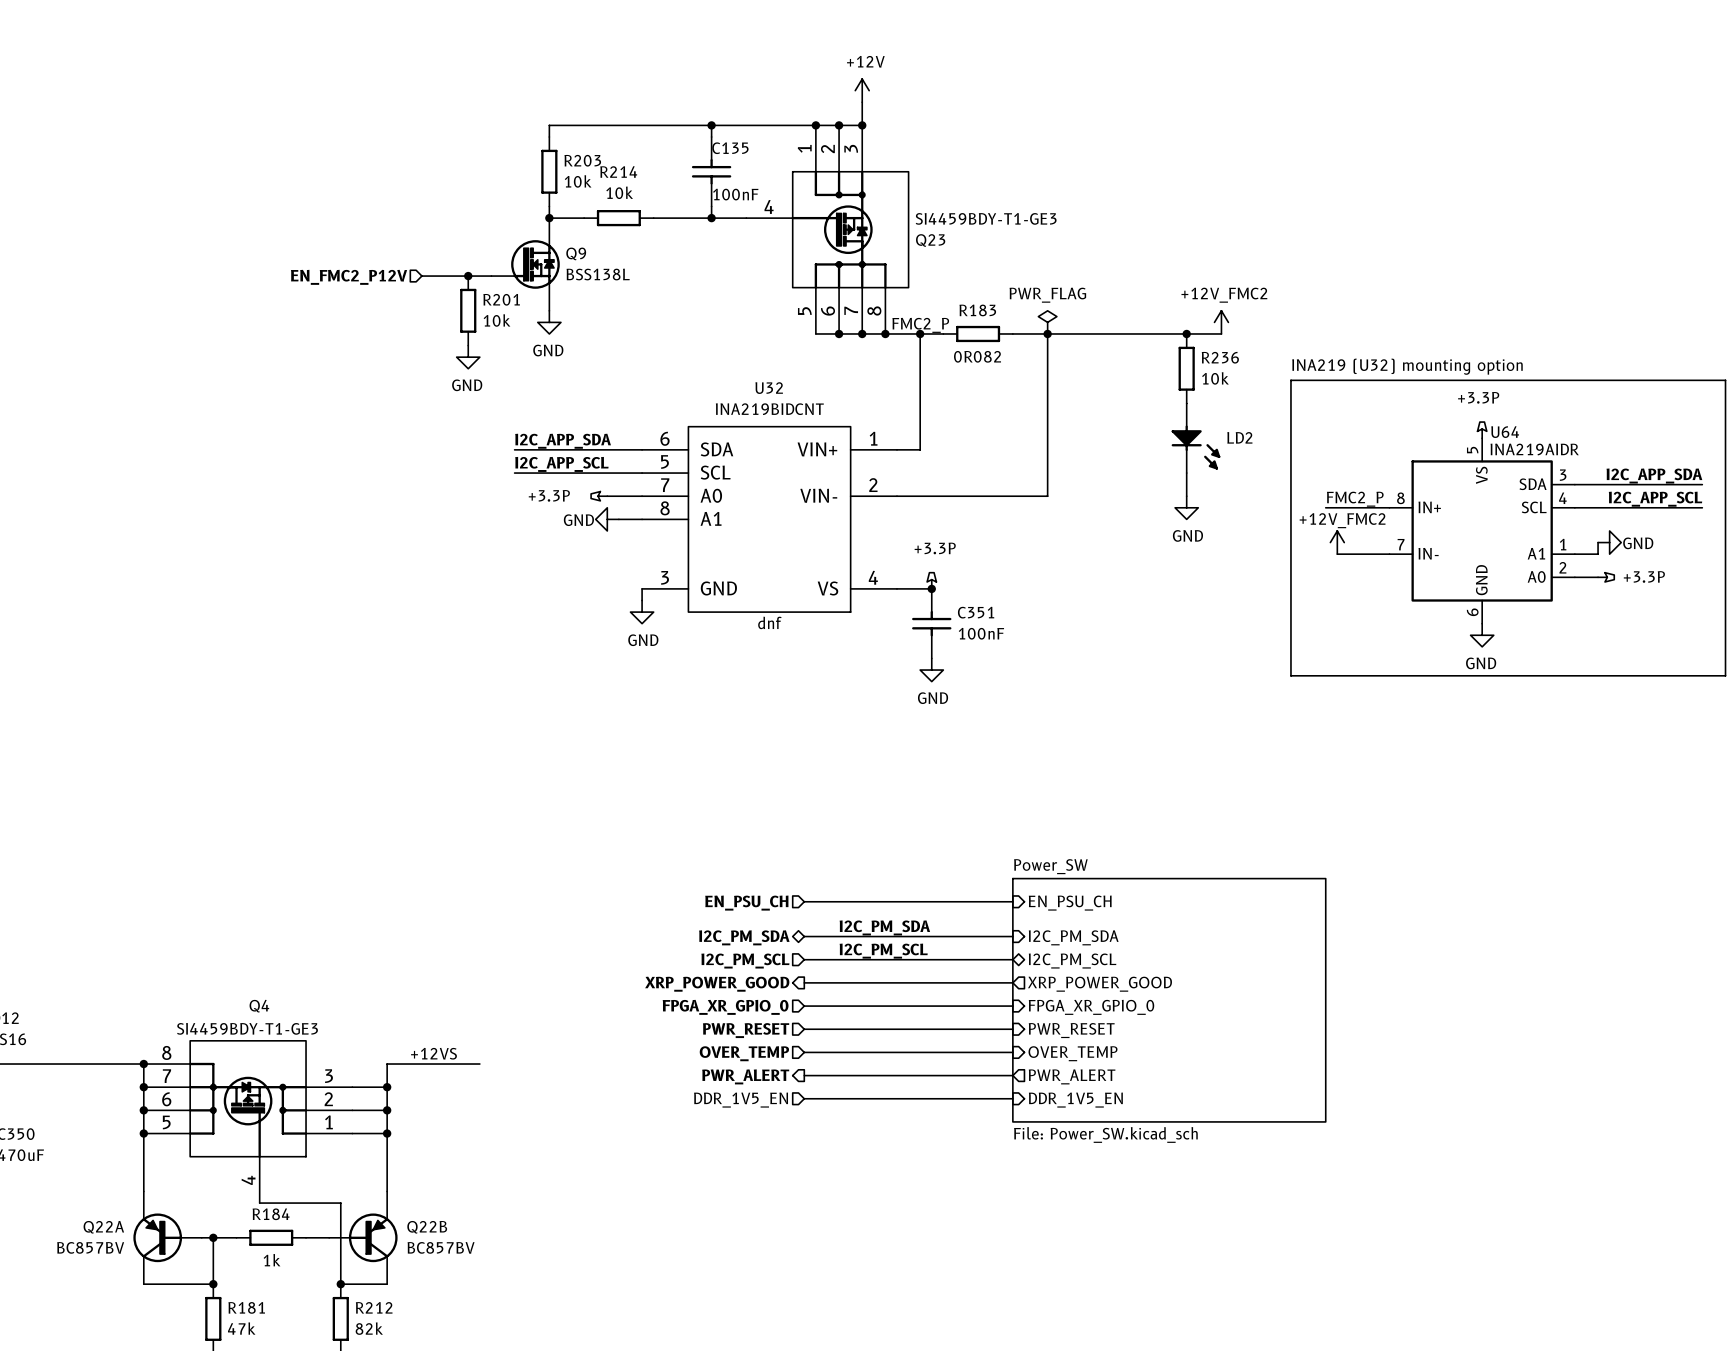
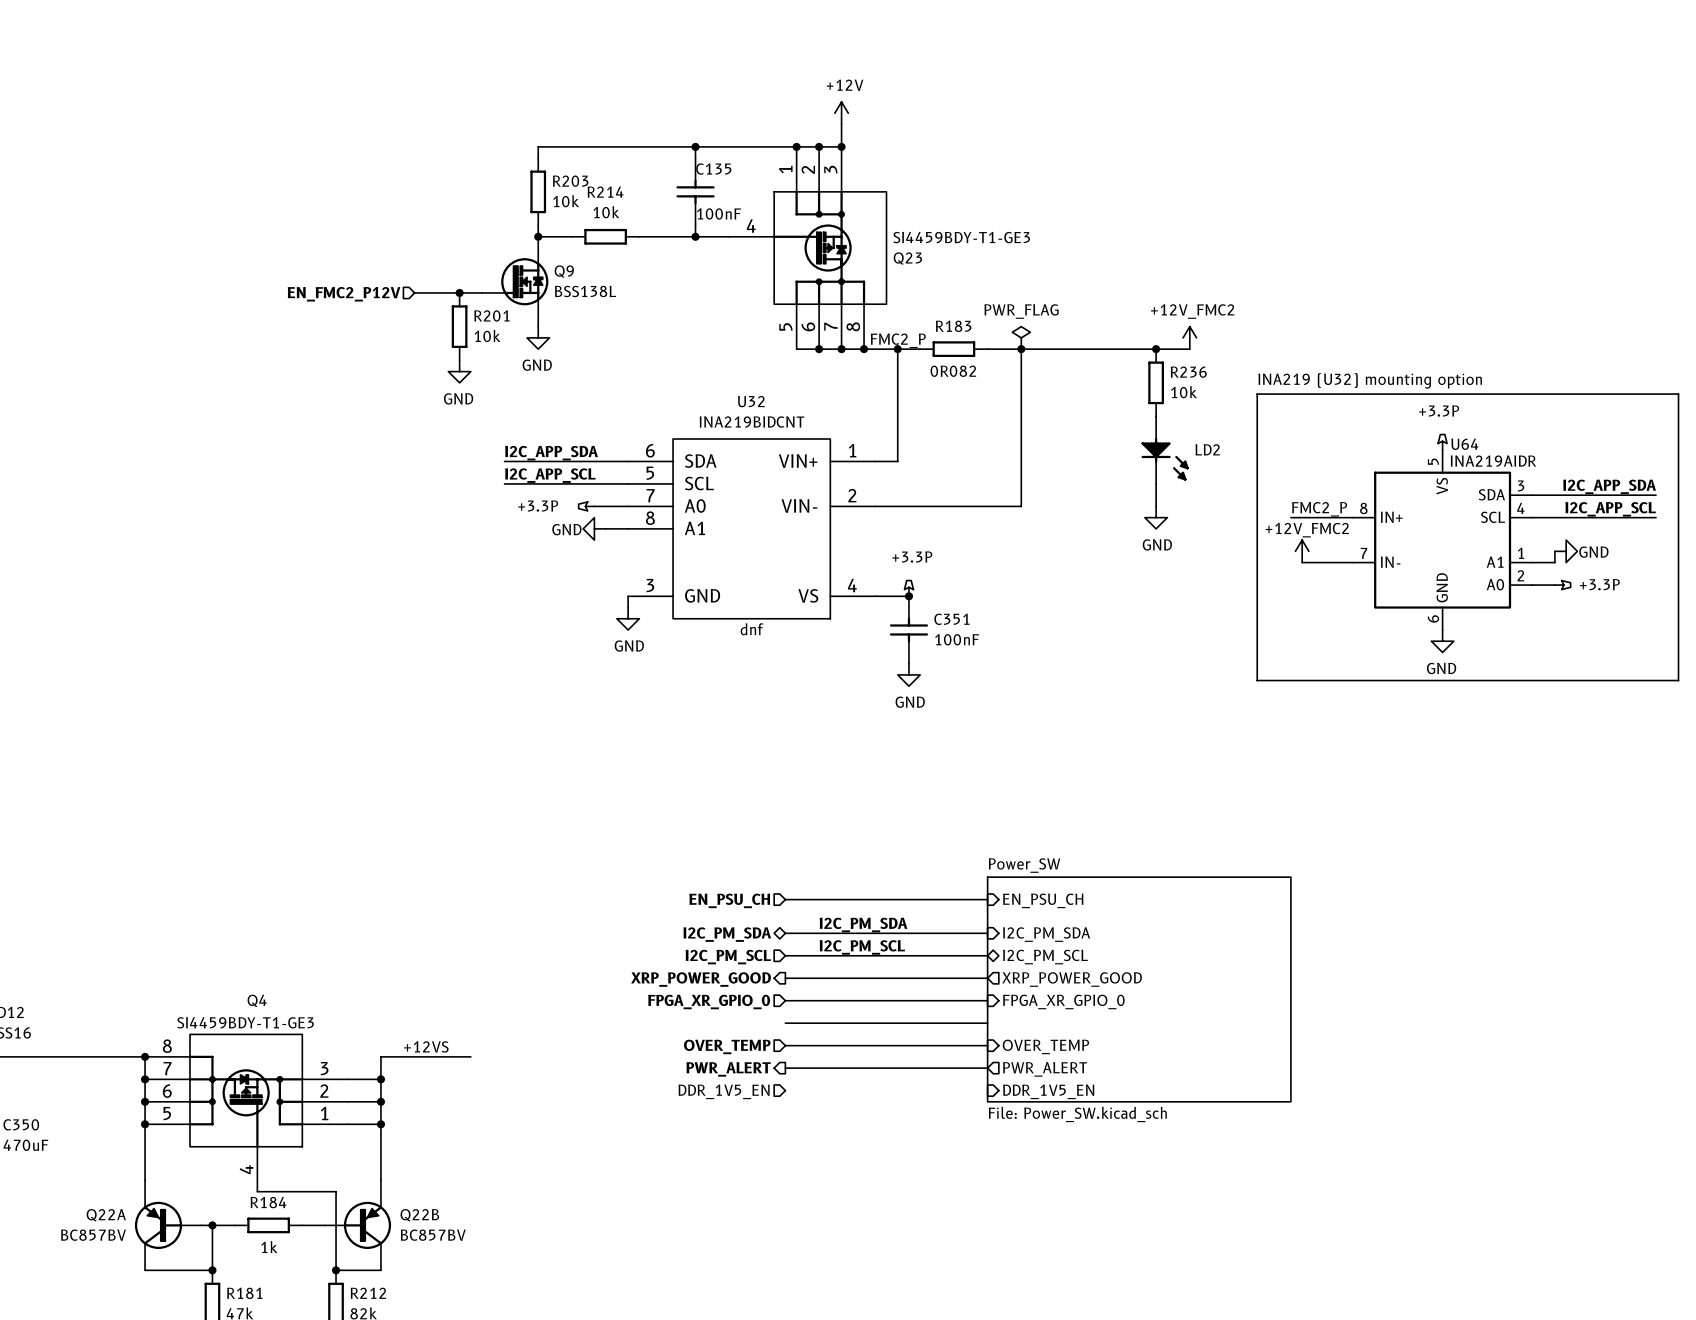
sheet Power_SW shape: [1012, 878, 1326, 1122] -> [987, 877, 1291, 1102]
hierarchical label: PWR_RESET (746, 1030) -> none
sheet pin: PWR_RESET (1071, 1030) -> none
wire: (804, 1098) (1012, 1098) -> none

